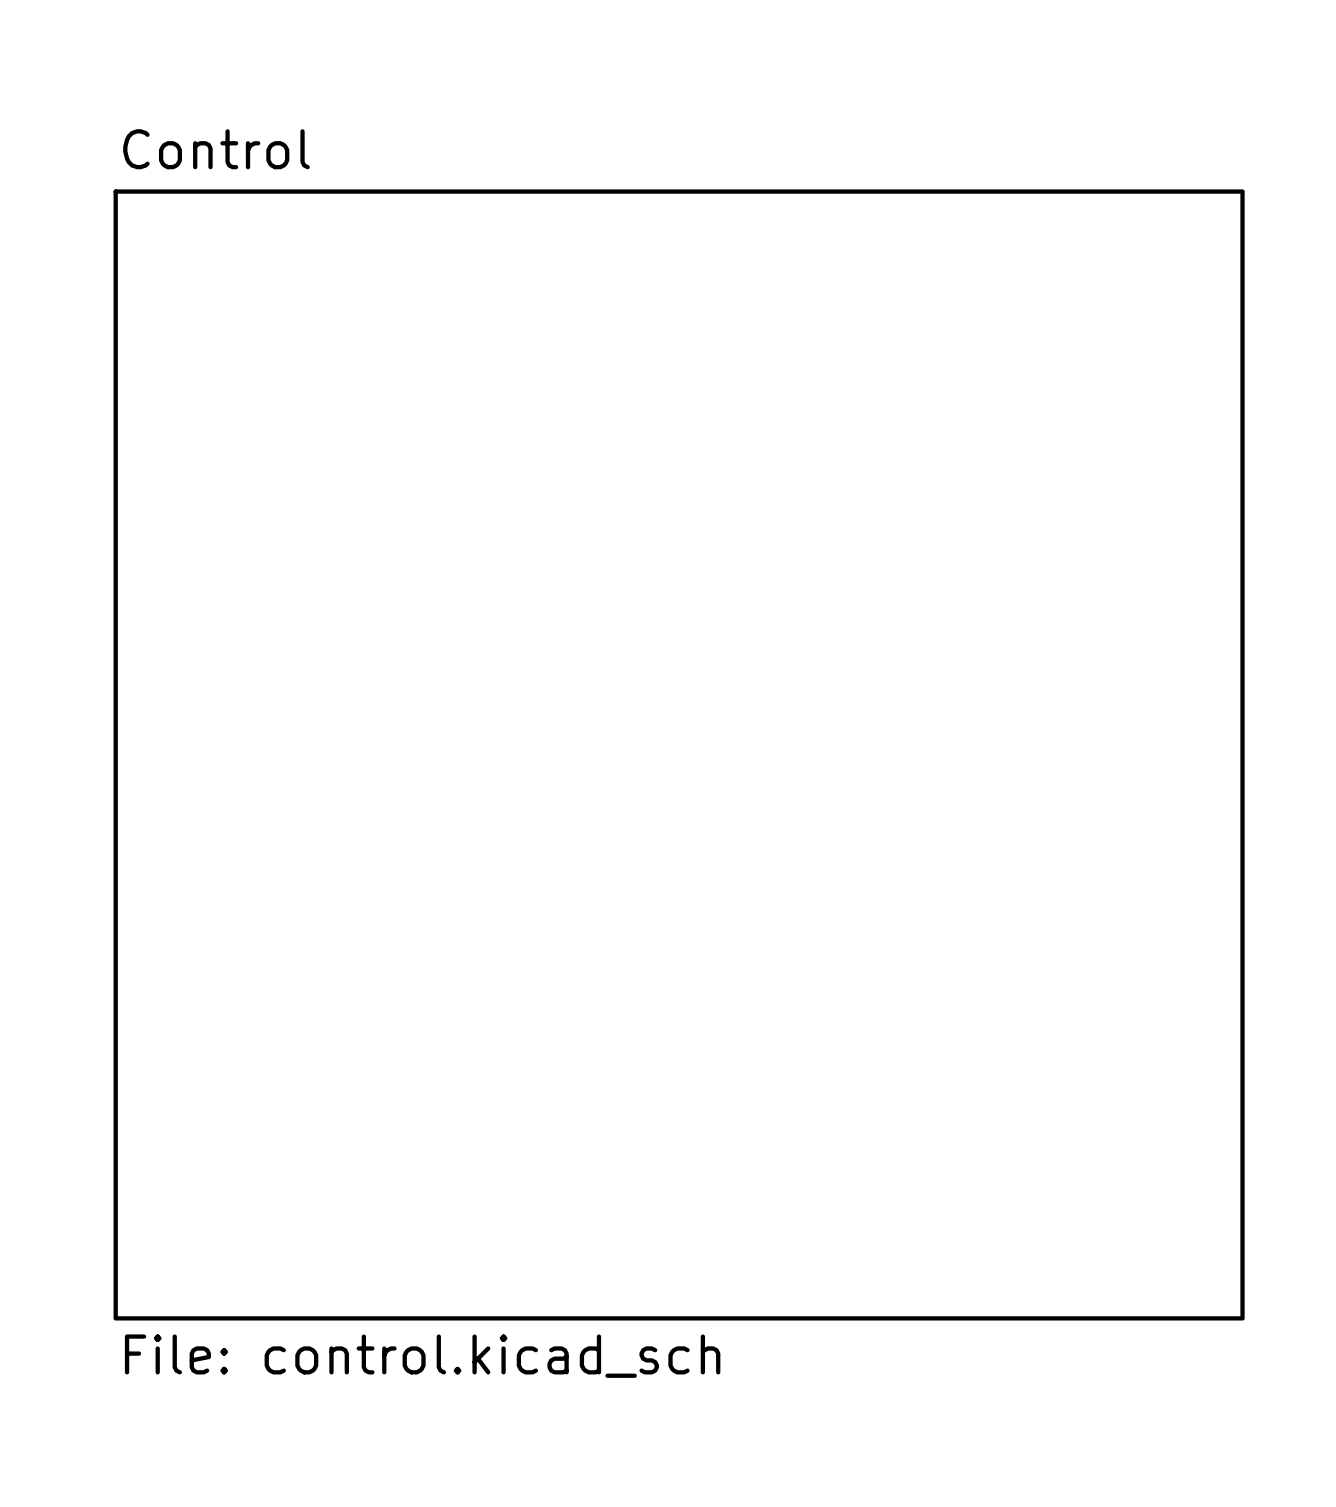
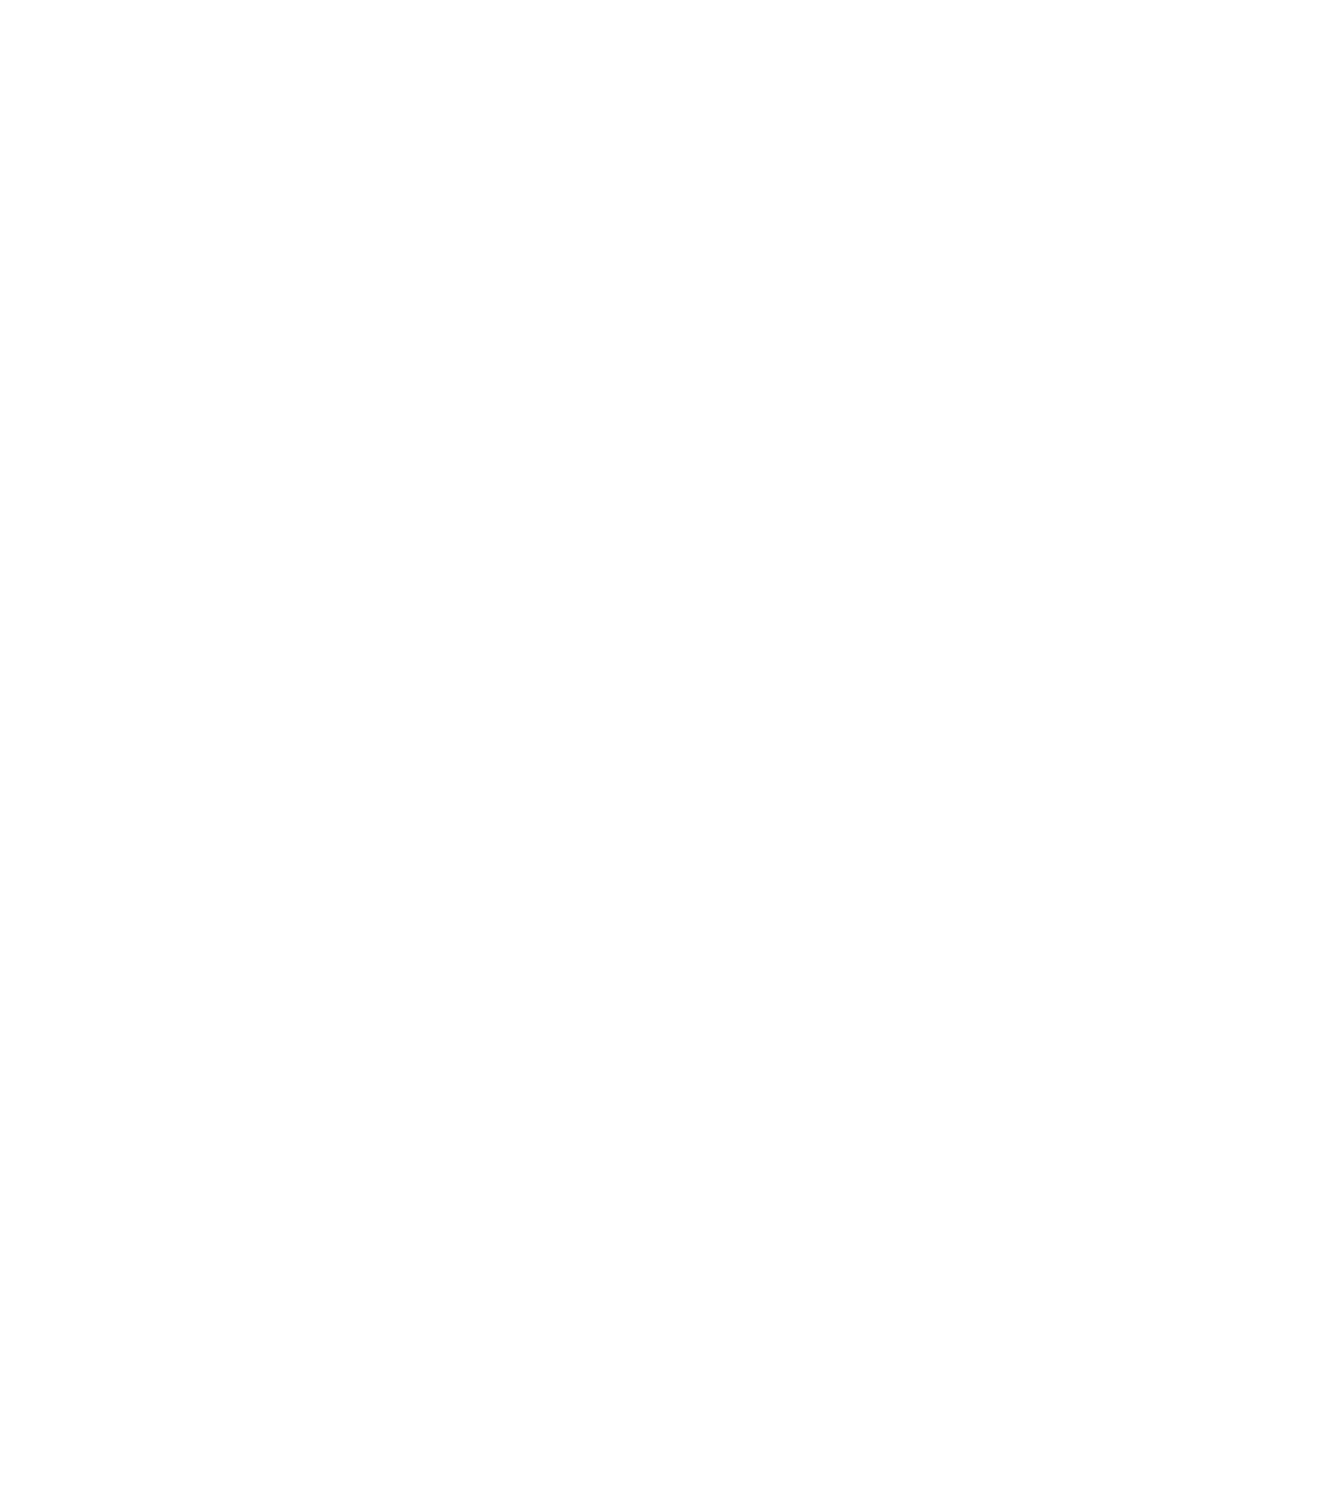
sheet Control: File: control.kicad_sch (679, 754) -> none

